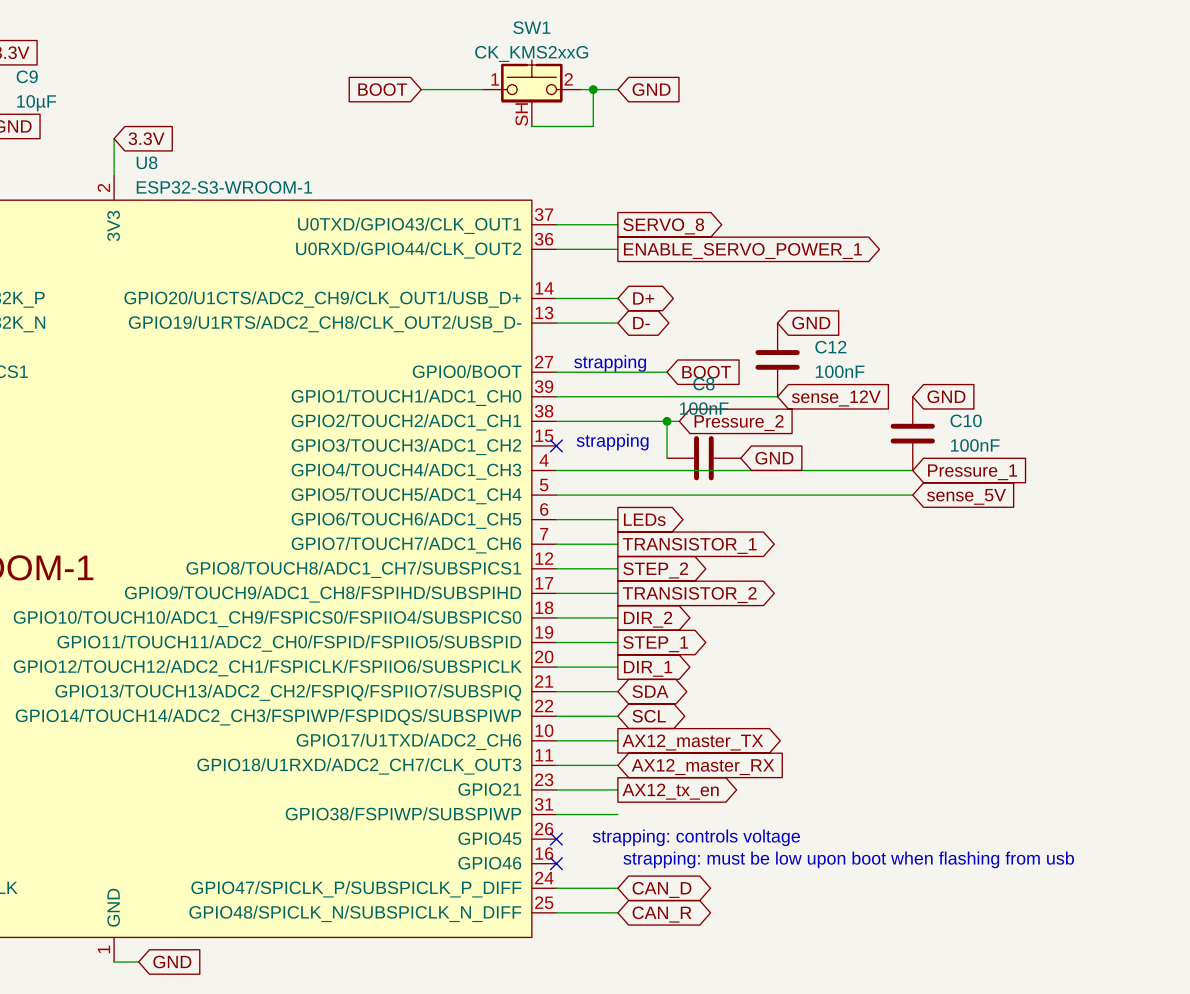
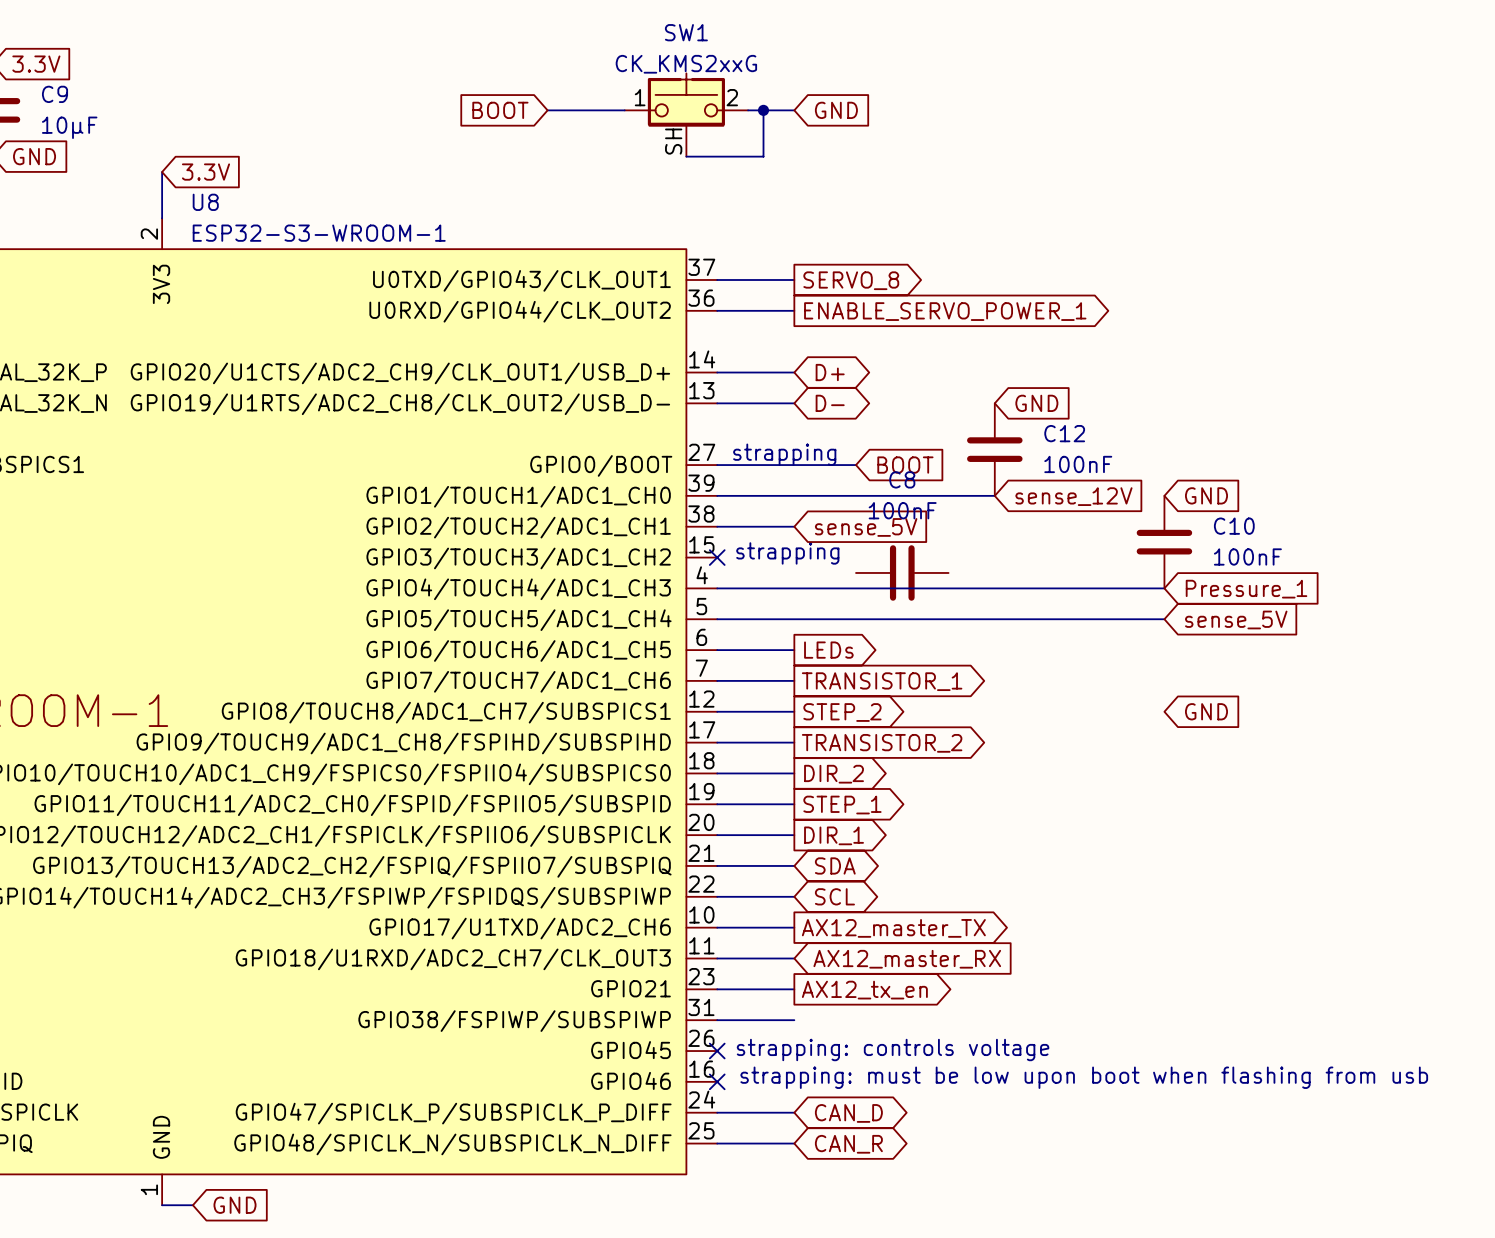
wire: (617, 421) (679, 421) -> none
wire: (667, 421) (667, 458) -> none
junction: (667, 421) -> none
global label: none -> sense_5V (866, 527)
global label: Pressure_2 (739, 423) -> none
global label position: GND (774, 458) -> GND (1206, 711)

